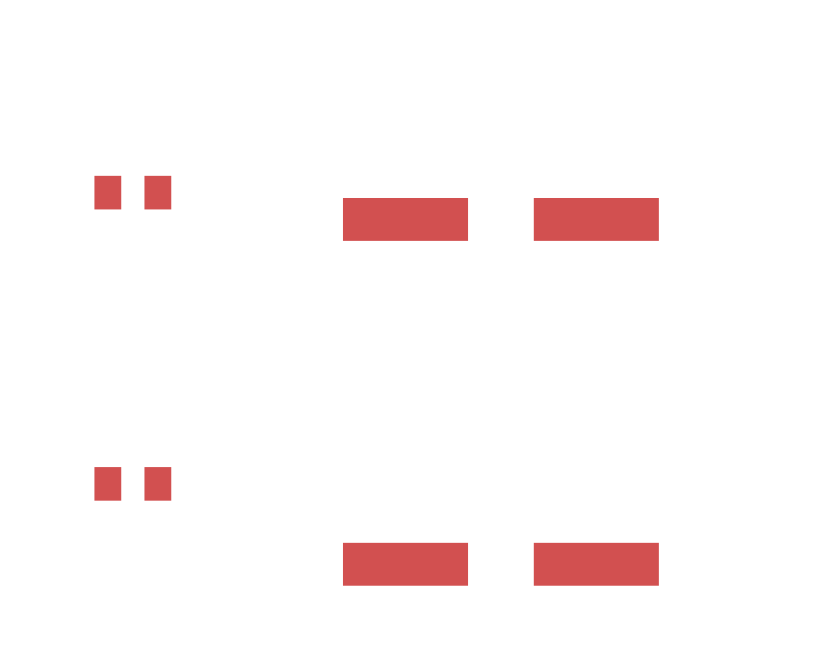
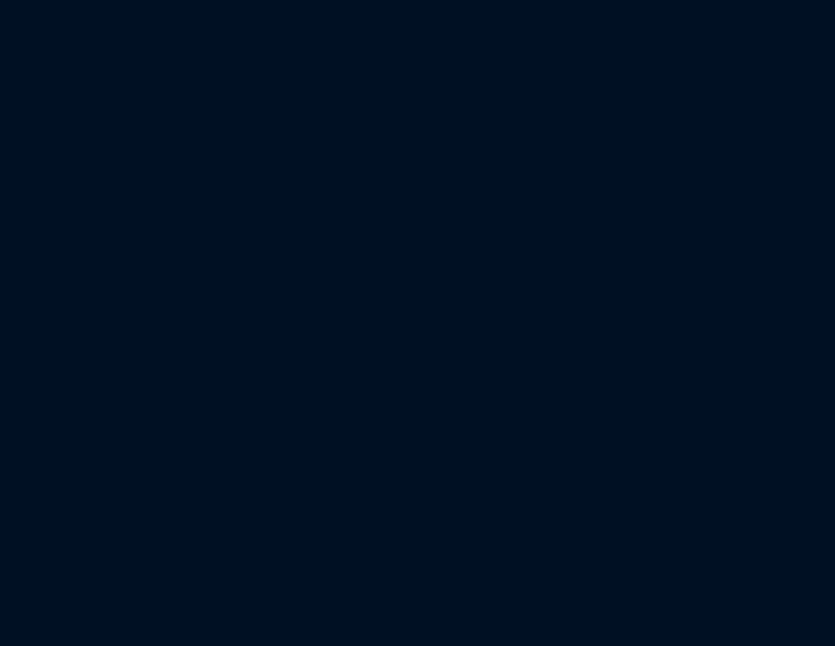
part: (132, 192) -> none
part: (500, 219) -> none
part: (132, 483) -> none
part: (500, 564) -> none

